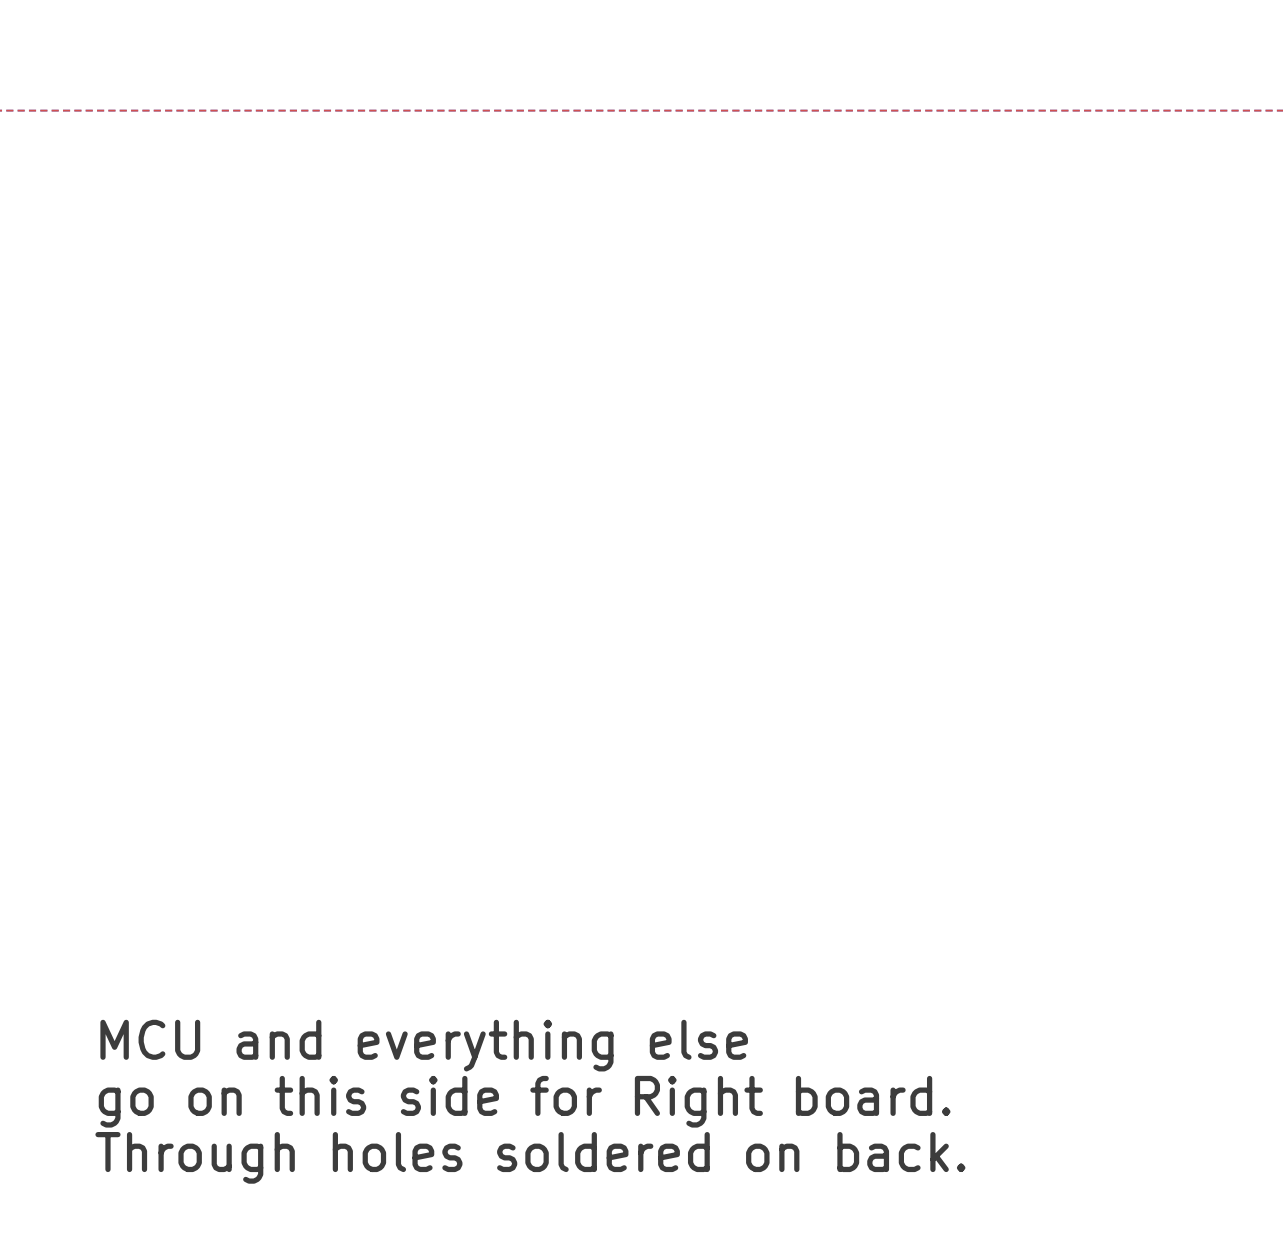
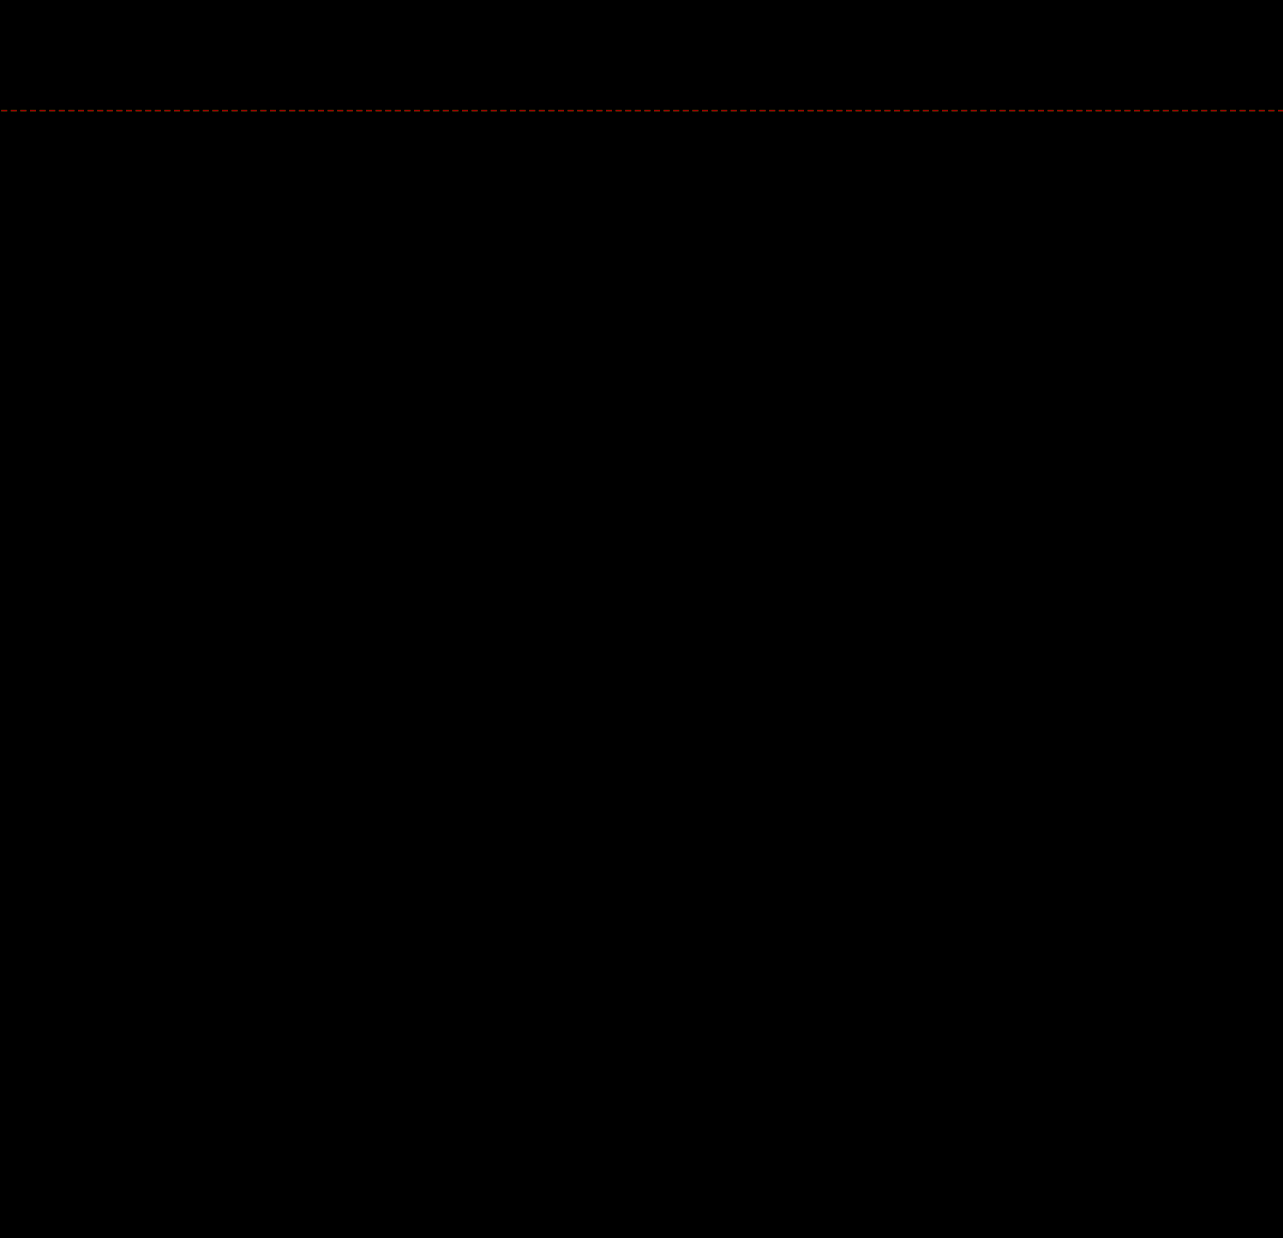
text: MCU and everything else (424, 1045) -> none
text: go on this side for Right board. (524, 1101) -> none
text: Through holes soldered on back. (530, 1157) -> none

